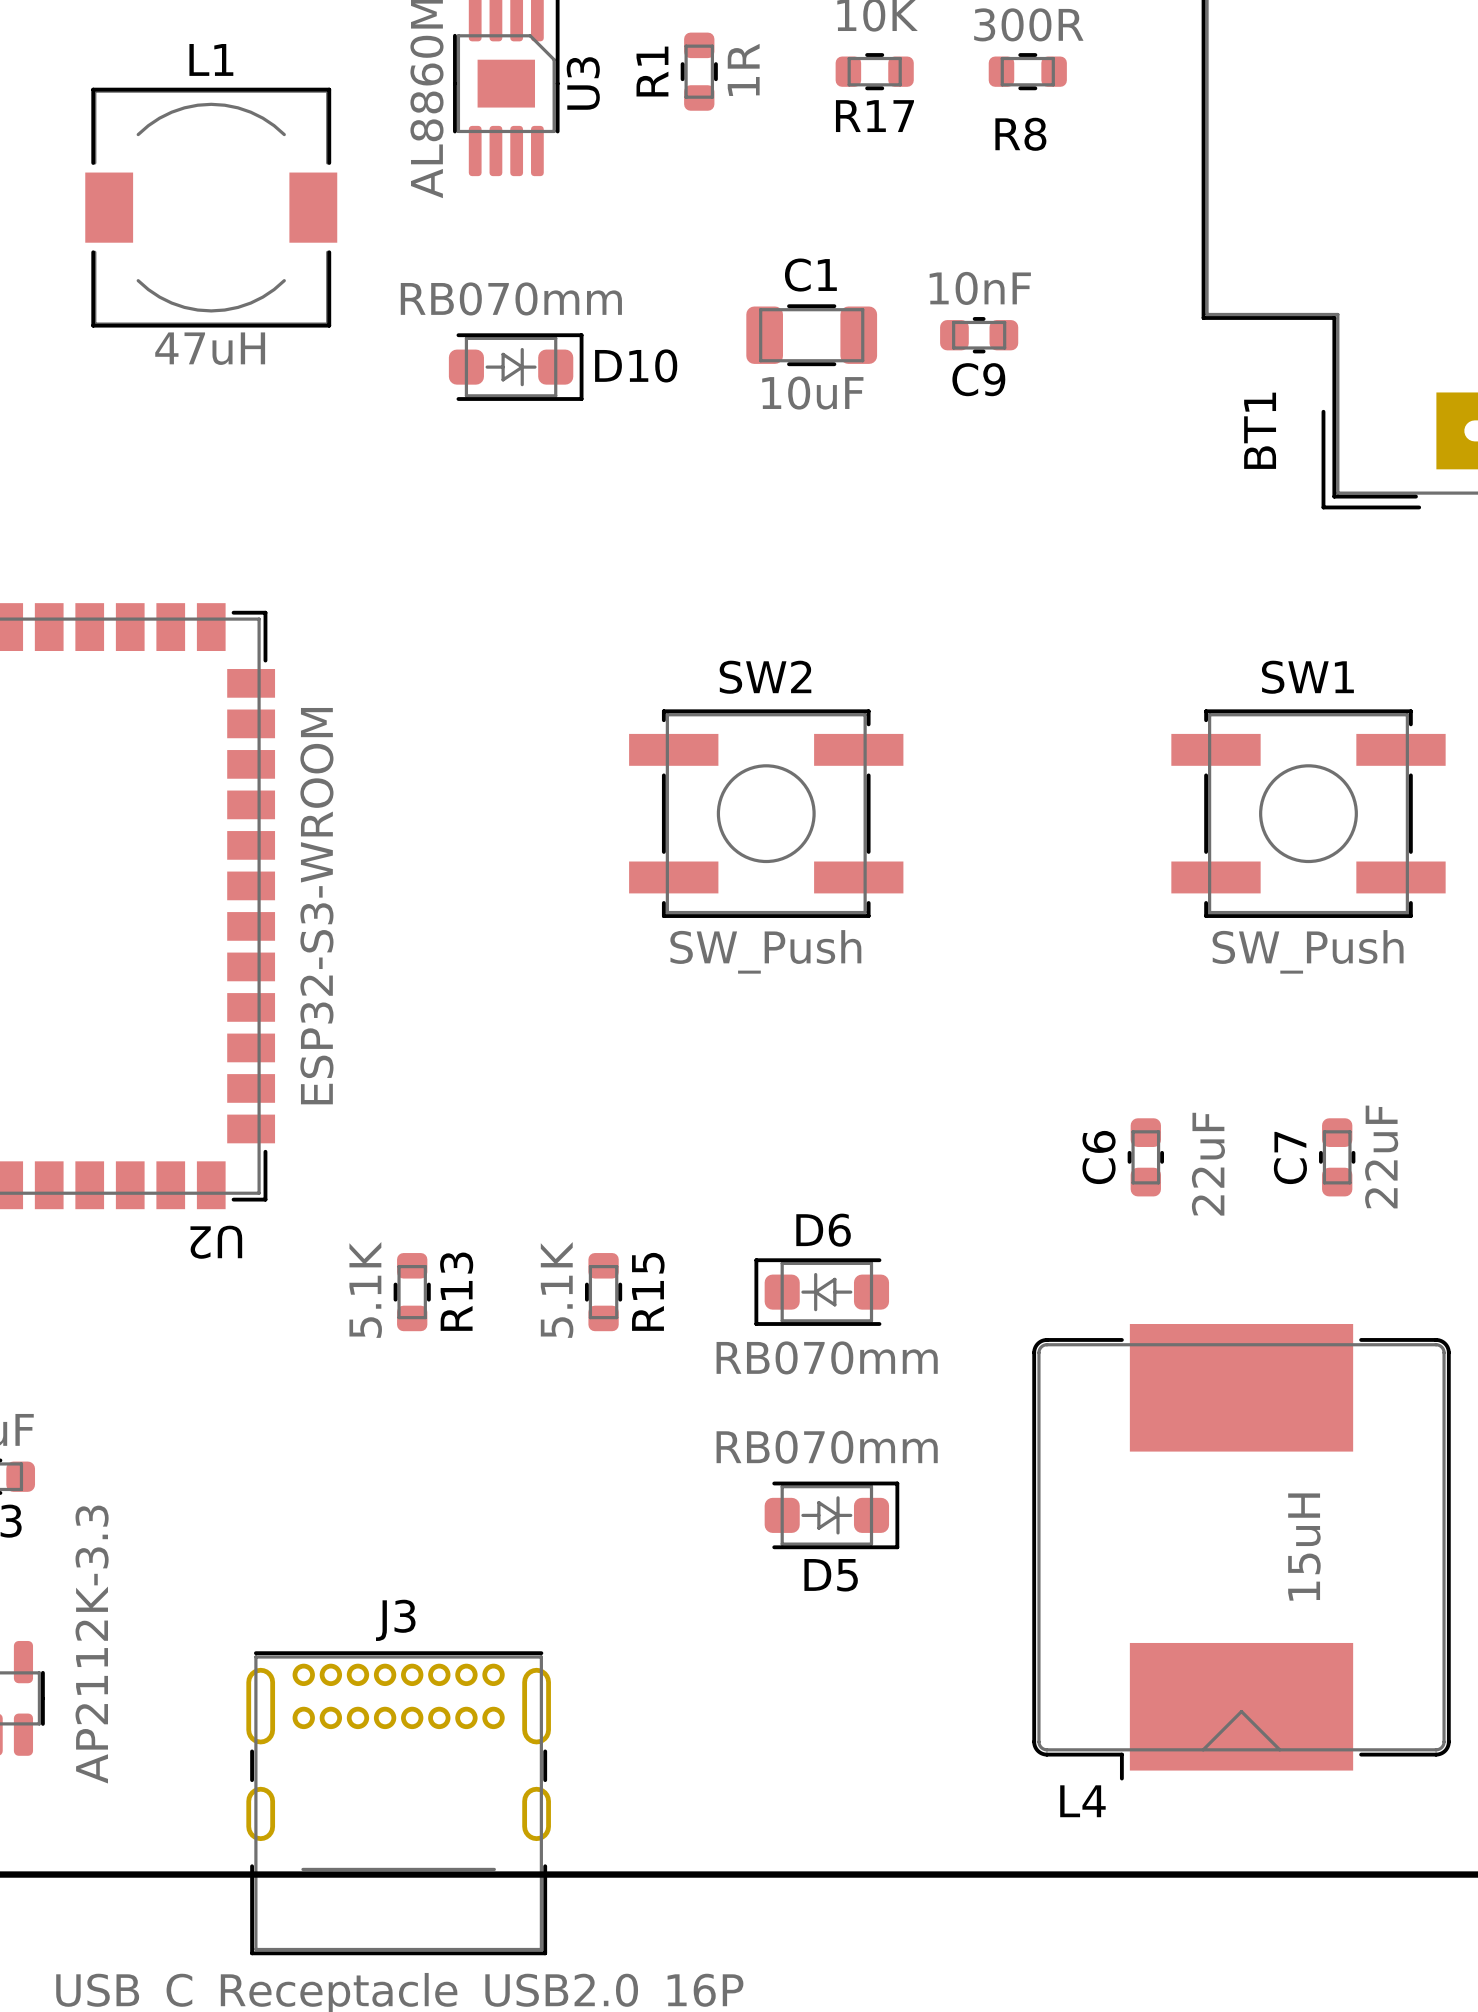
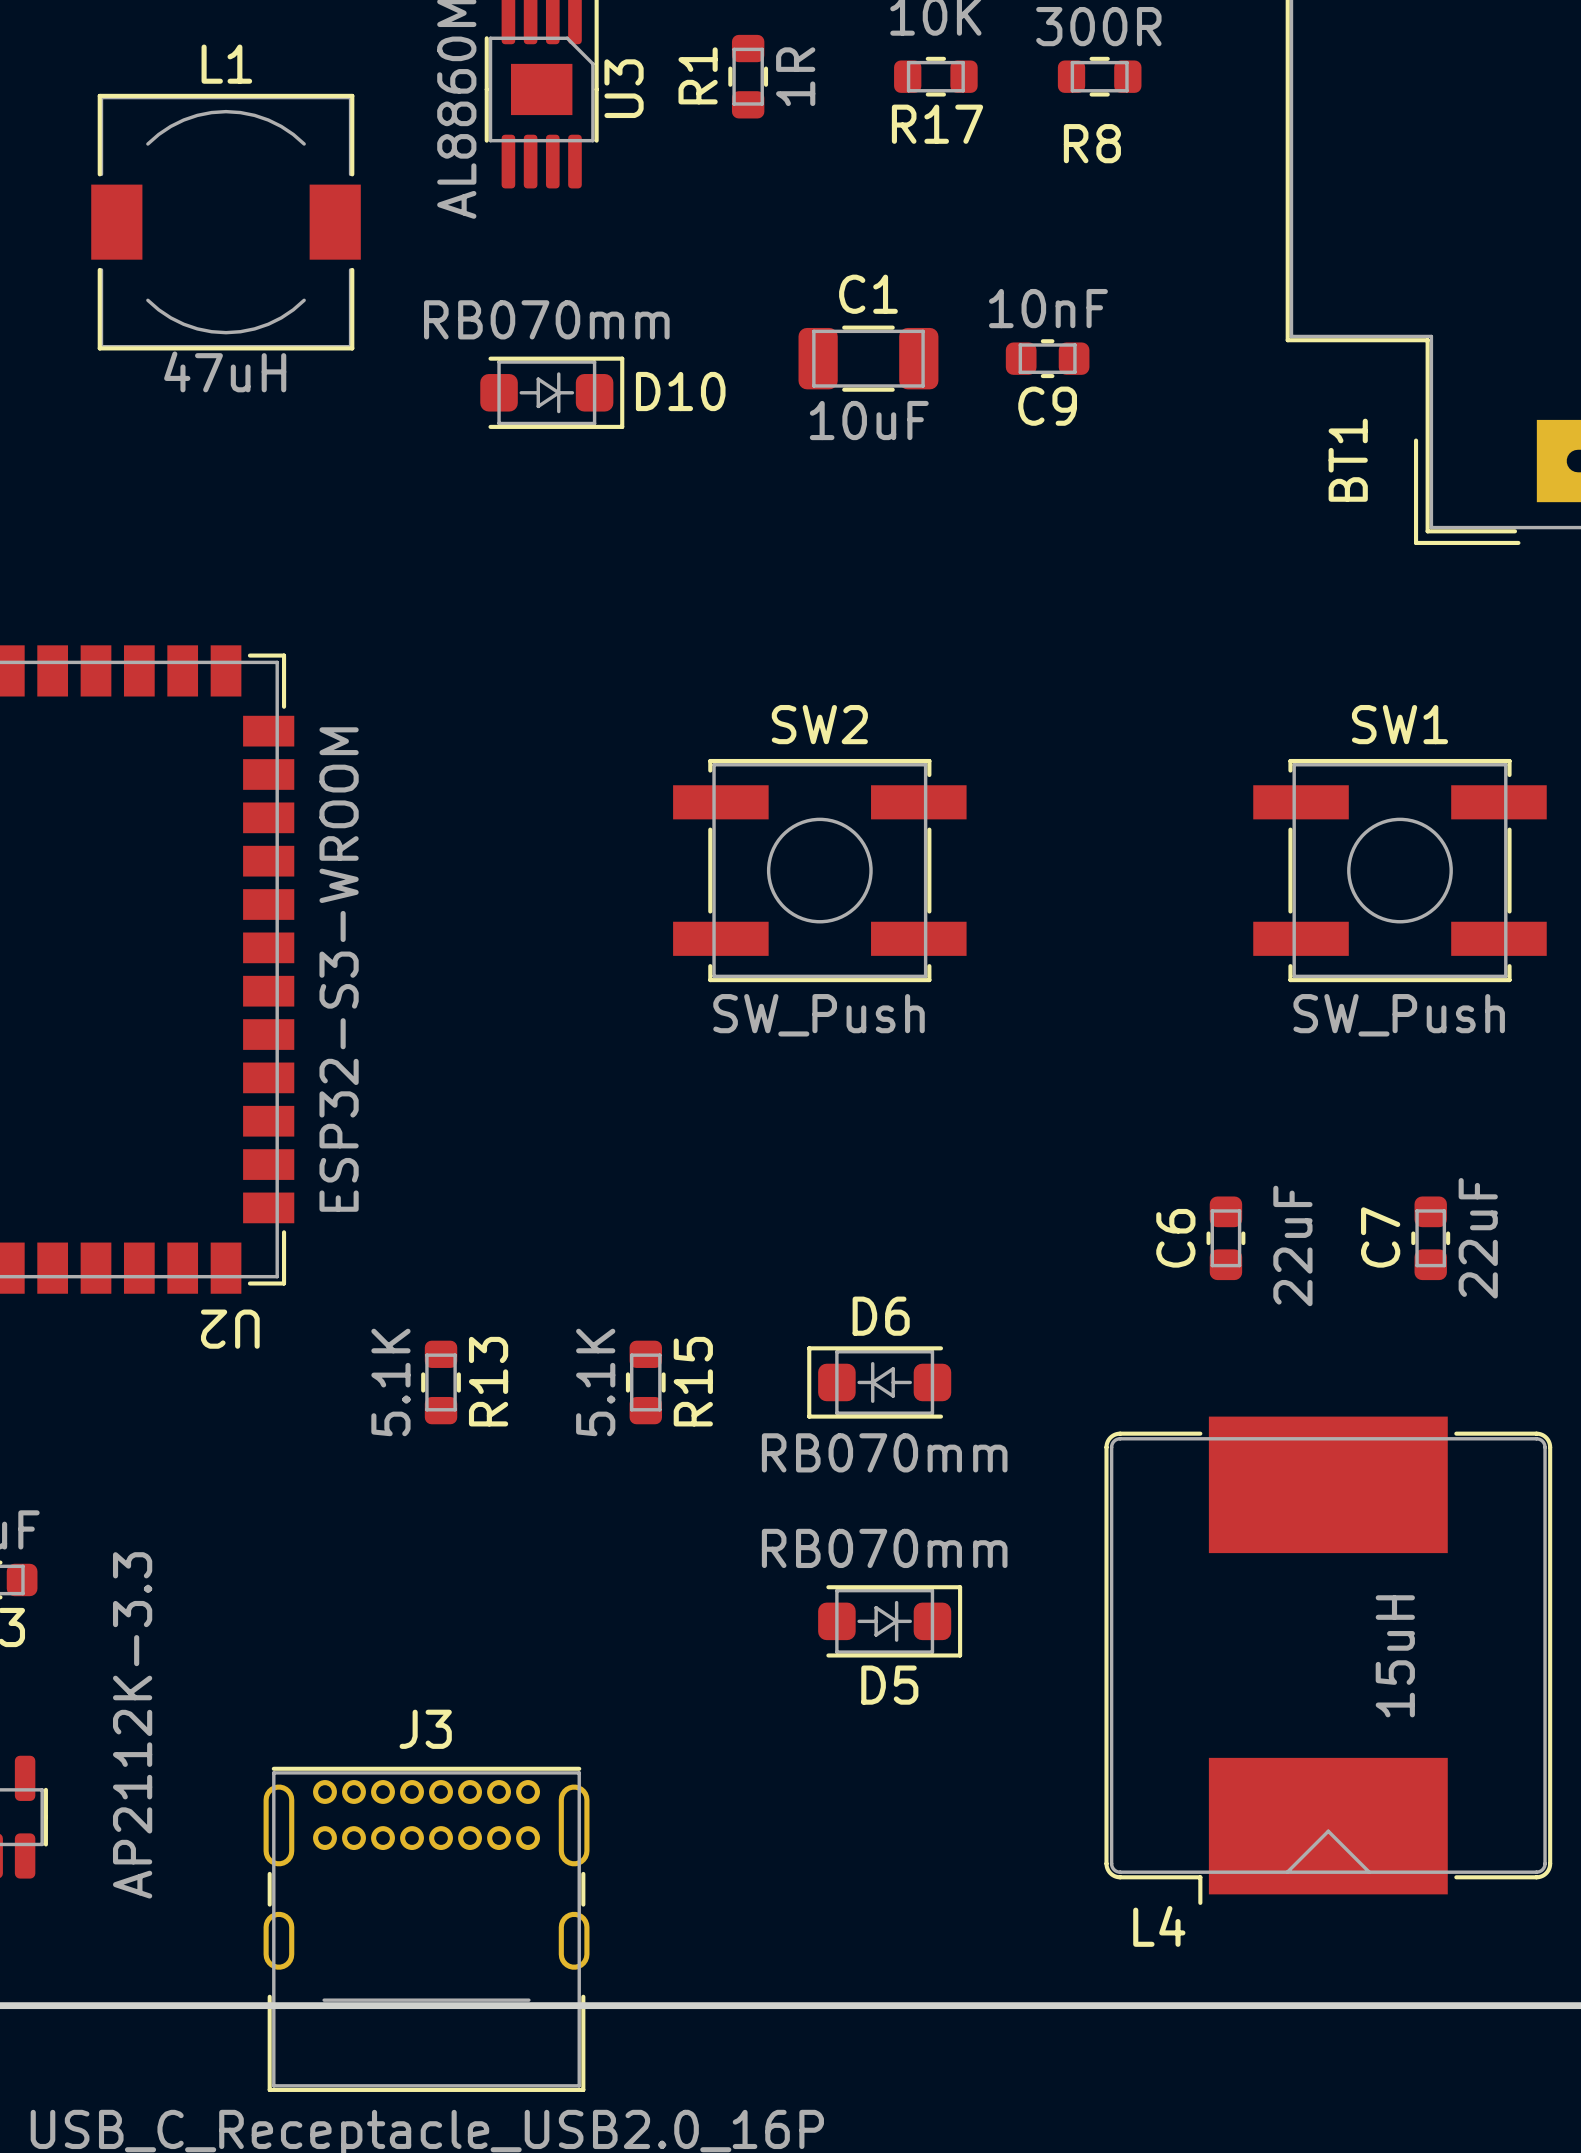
part value position: AP2112K-3.3 (92, 1644) -> AP2112K-3.3 (132, 1725)

